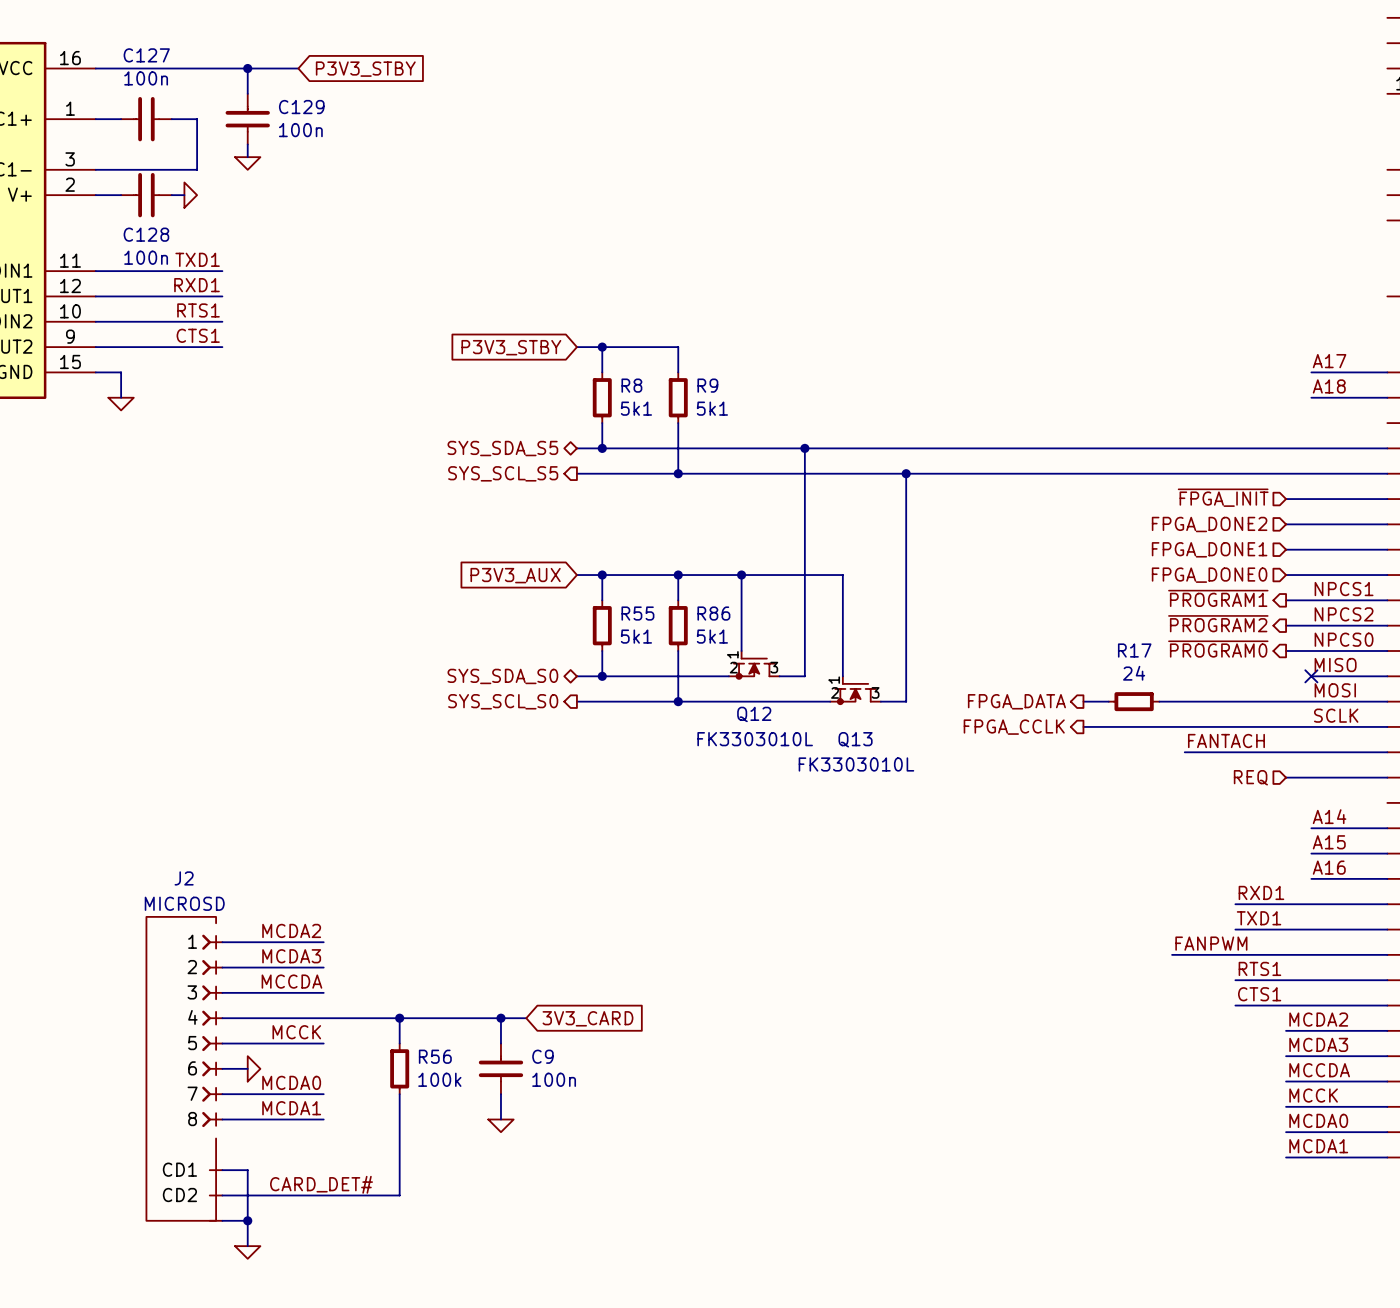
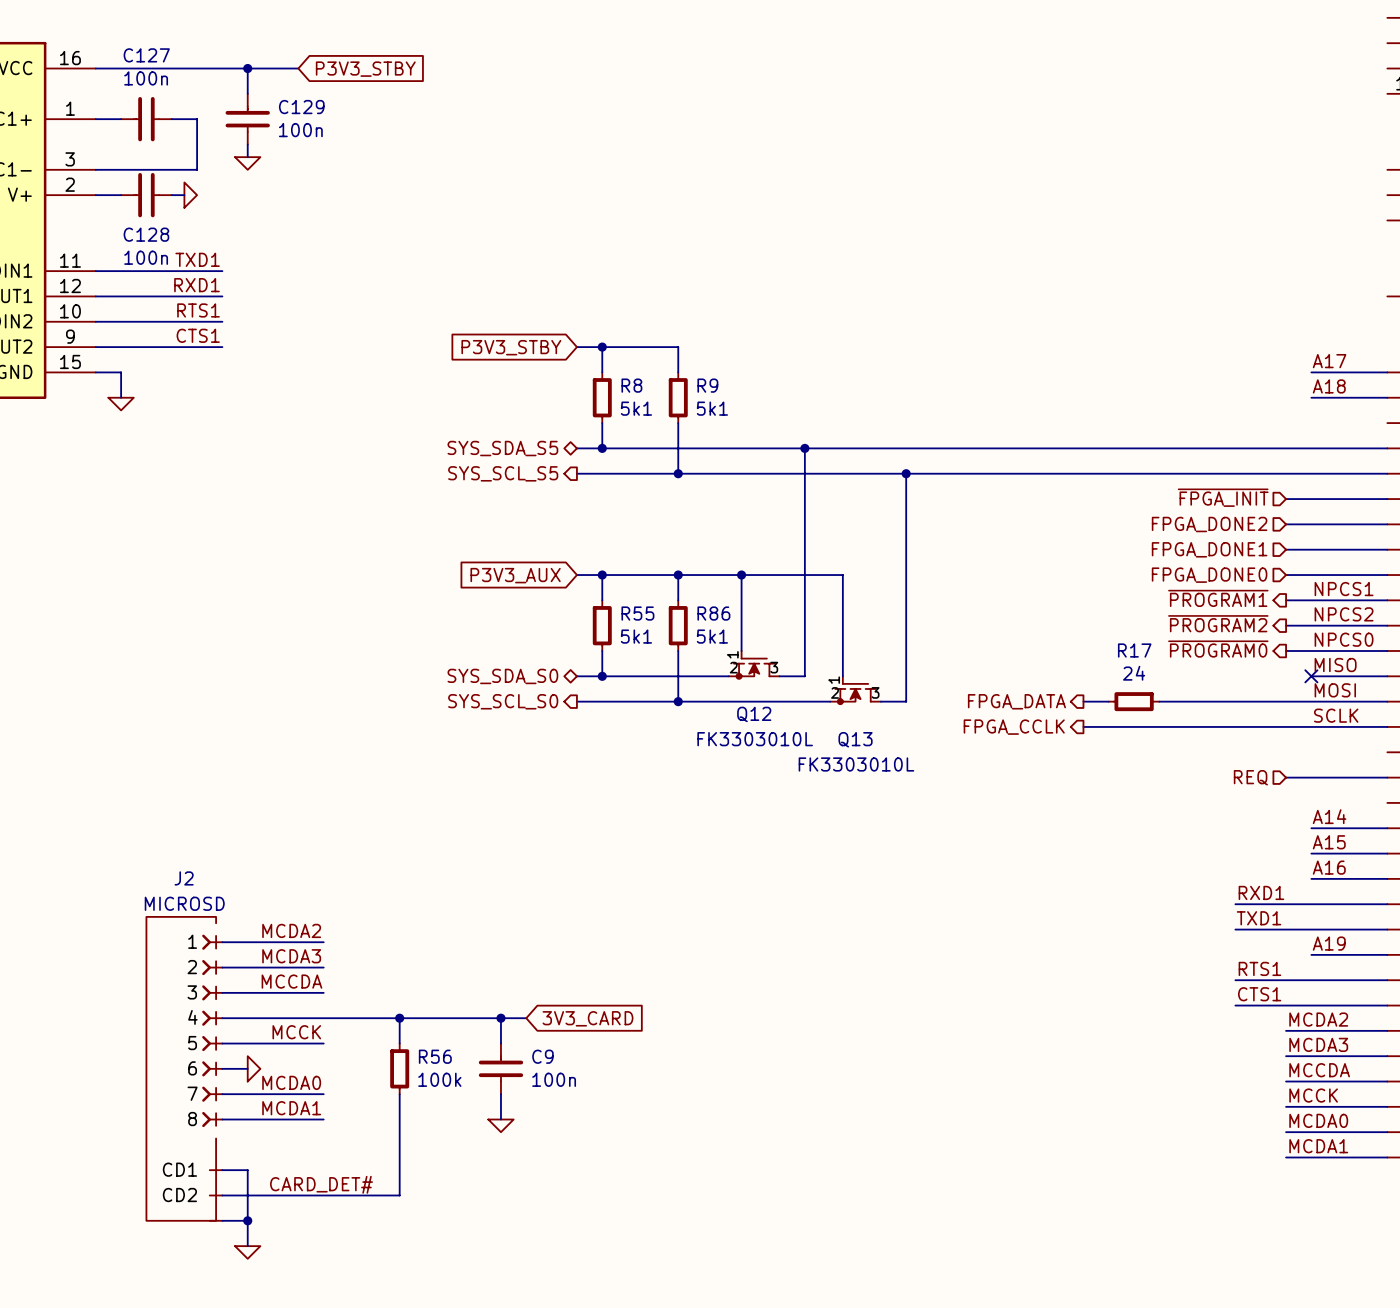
label: FANTACH (1226, 740) -> none
wire: (1184, 752) (1387, 752) -> none
label: FANPWM (1211, 943) -> none
label: none -> A19 (1329, 943)
wire: (1172, 954) (1311, 954) -> none

